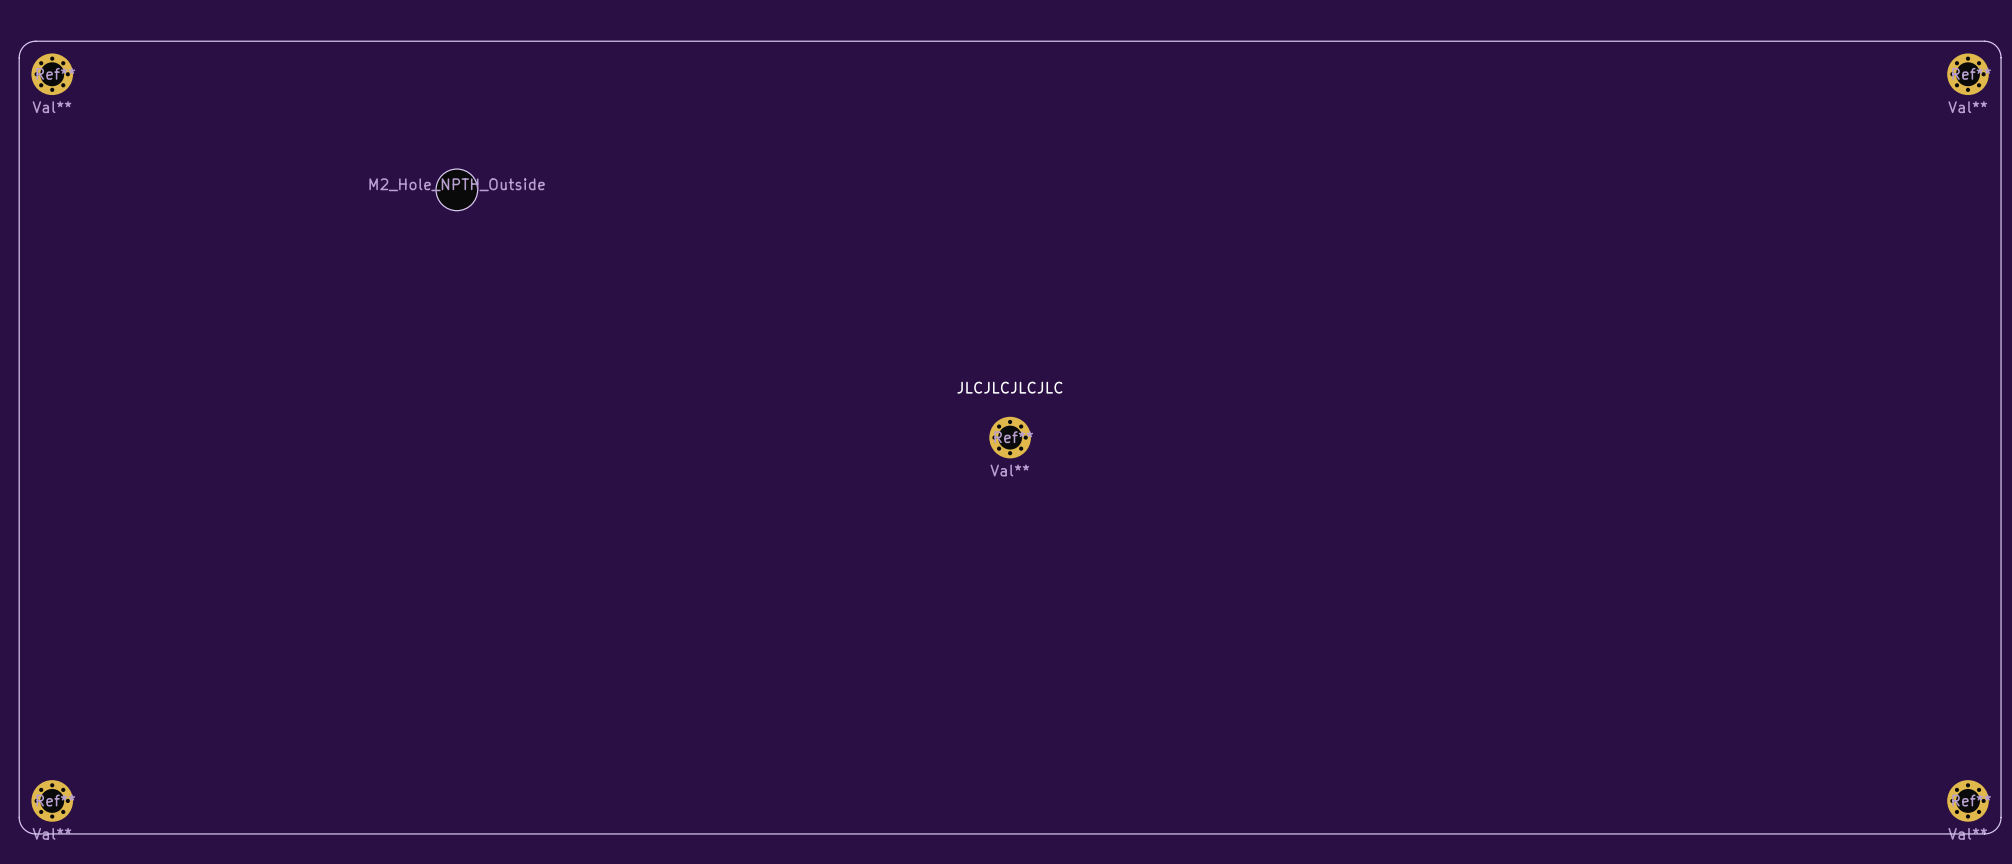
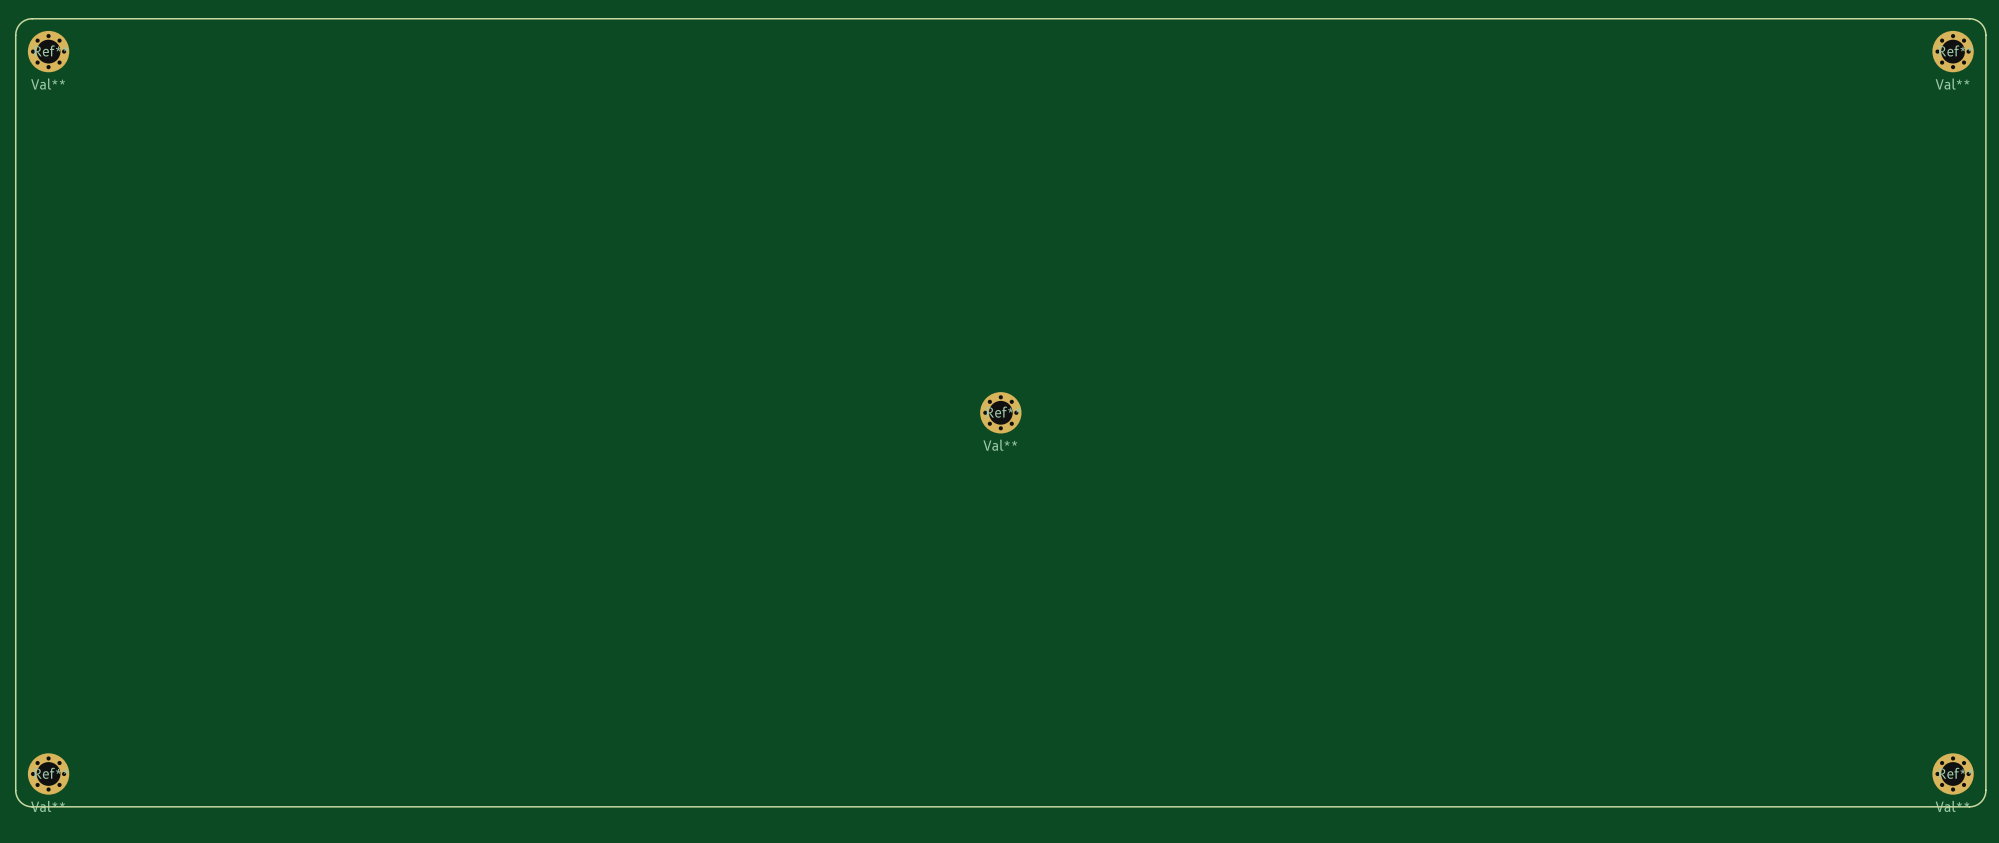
part: M2_Hole_NPTH_Outside (456, 189) -> none
text: JLCJLCJLCJLC (1009, 387) -> none

